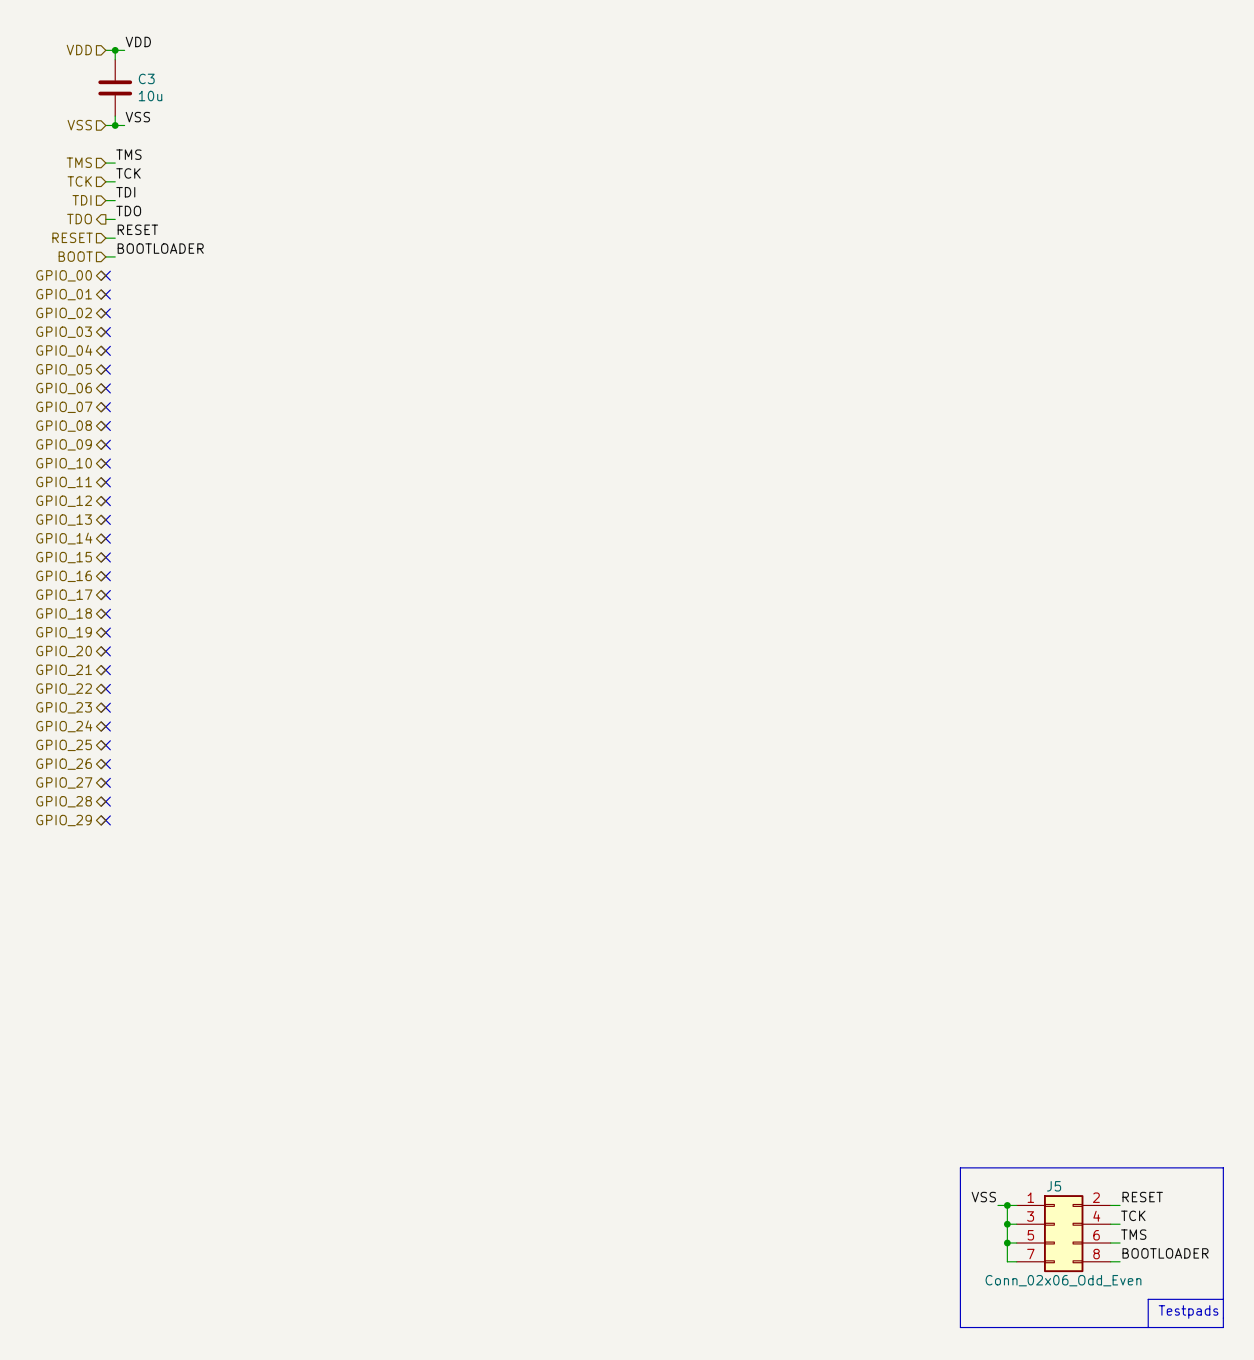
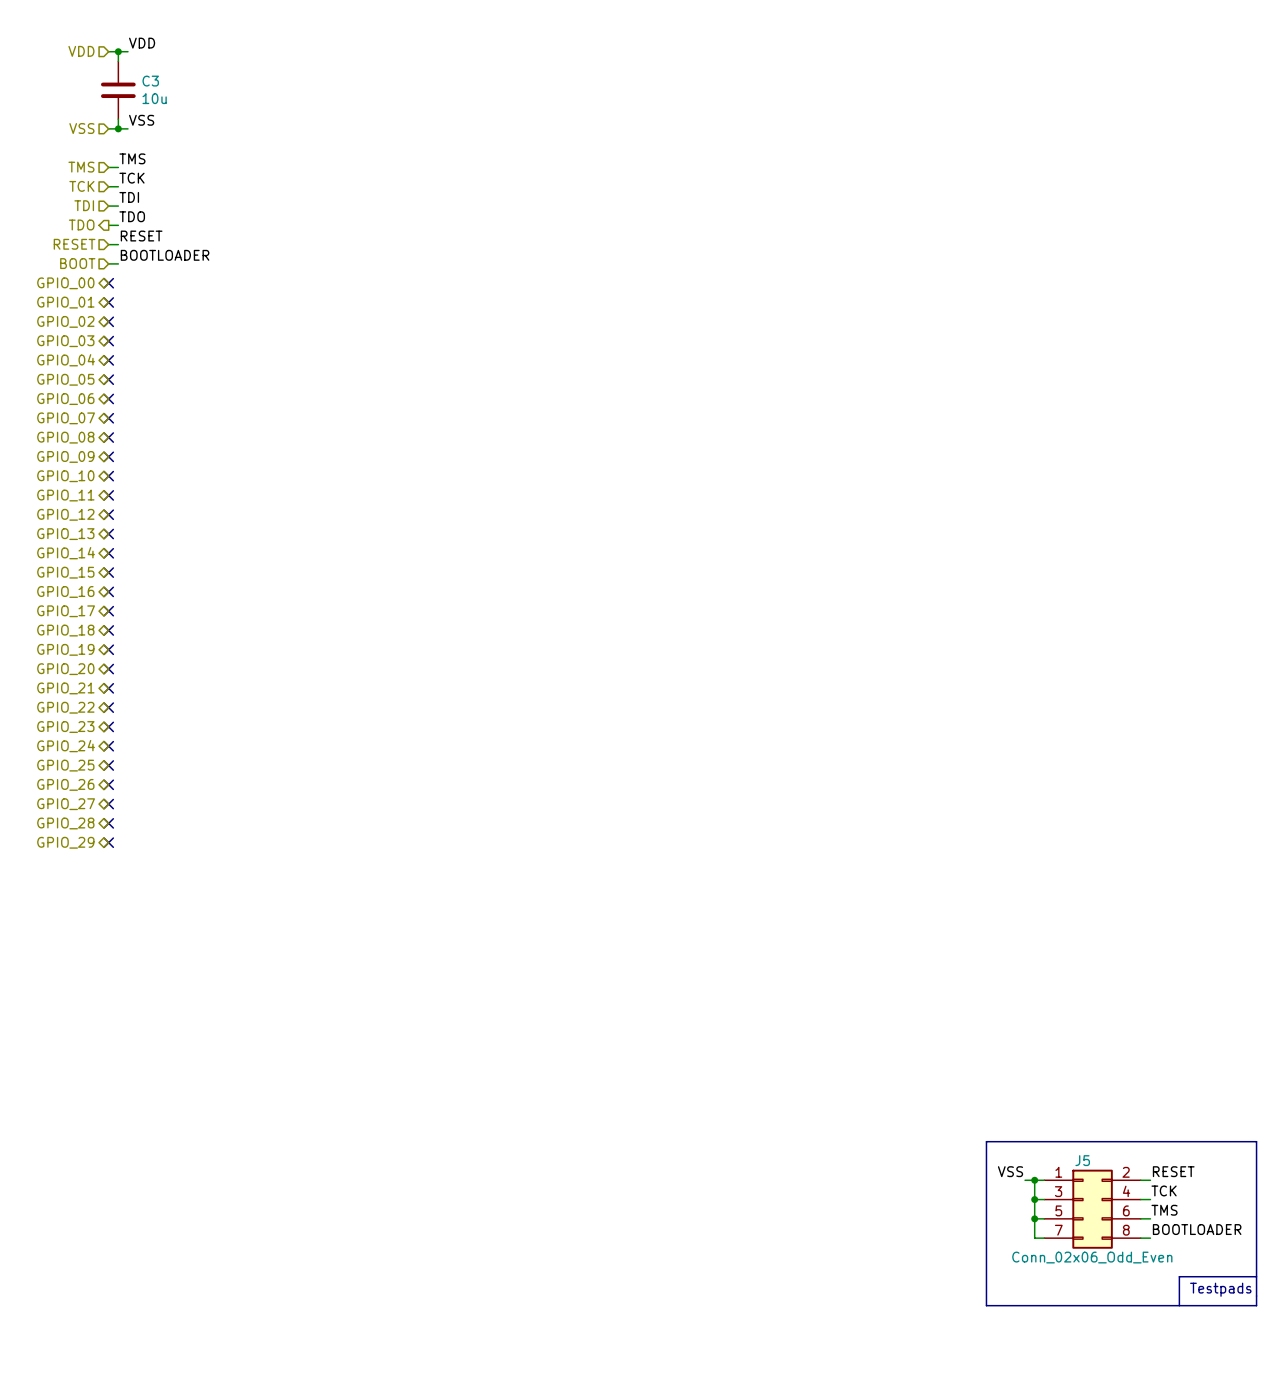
label: none -> RESET (1173, 1171)
wire: none -> (1025, 1180) (1044, 1180)
wire: none -> (1034, 1180) (1034, 1238)
junction: none -> (1034, 1180)
line: (960, 1167) (1223, 1167) -> (986, 1199) (986, 1141) (1256, 1141) (1256, 1199)
junction: none -> (1034, 1199)
junction: none -> (1034, 1218)
label position: VSS (983, 1197) -> VSS (1010, 1171)
label: RESET (1142, 1197) -> BOOTLOADER (1197, 1229)
wire: (997, 1205) (1007, 1205) (1007, 1261) (1016, 1261) -> none
junction: (1007, 1205) -> none
label position: TCK (1133, 1215) -> TCK (1164, 1190)
junction: (1007, 1224) -> none
J5 position: (1063, 1233) -> (1092, 1209)
label position: TMS (1133, 1234) -> TMS (1164, 1210)
wire: (1007, 1243) (1016, 1243) -> (1034, 1218) (1044, 1218)
junction: (1007, 1243) -> none
wire: (1110, 1243) (1120, 1243) -> (1140, 1218) (1150, 1218)
label: BOOTLOADER (1165, 1253) -> none
wire: (1110, 1261) (1120, 1261) -> (1140, 1180) (1150, 1180)
line: (960, 1271) (960, 1327) (1223, 1327) (1223, 1271) -> (986, 1305) (1256, 1305)
line: (1223, 1299) (1148, 1299) (1148, 1327) -> (1256, 1276) (1179, 1276) (1179, 1305)
text position: Testpads (1188, 1312) -> Testpads (1220, 1289)

